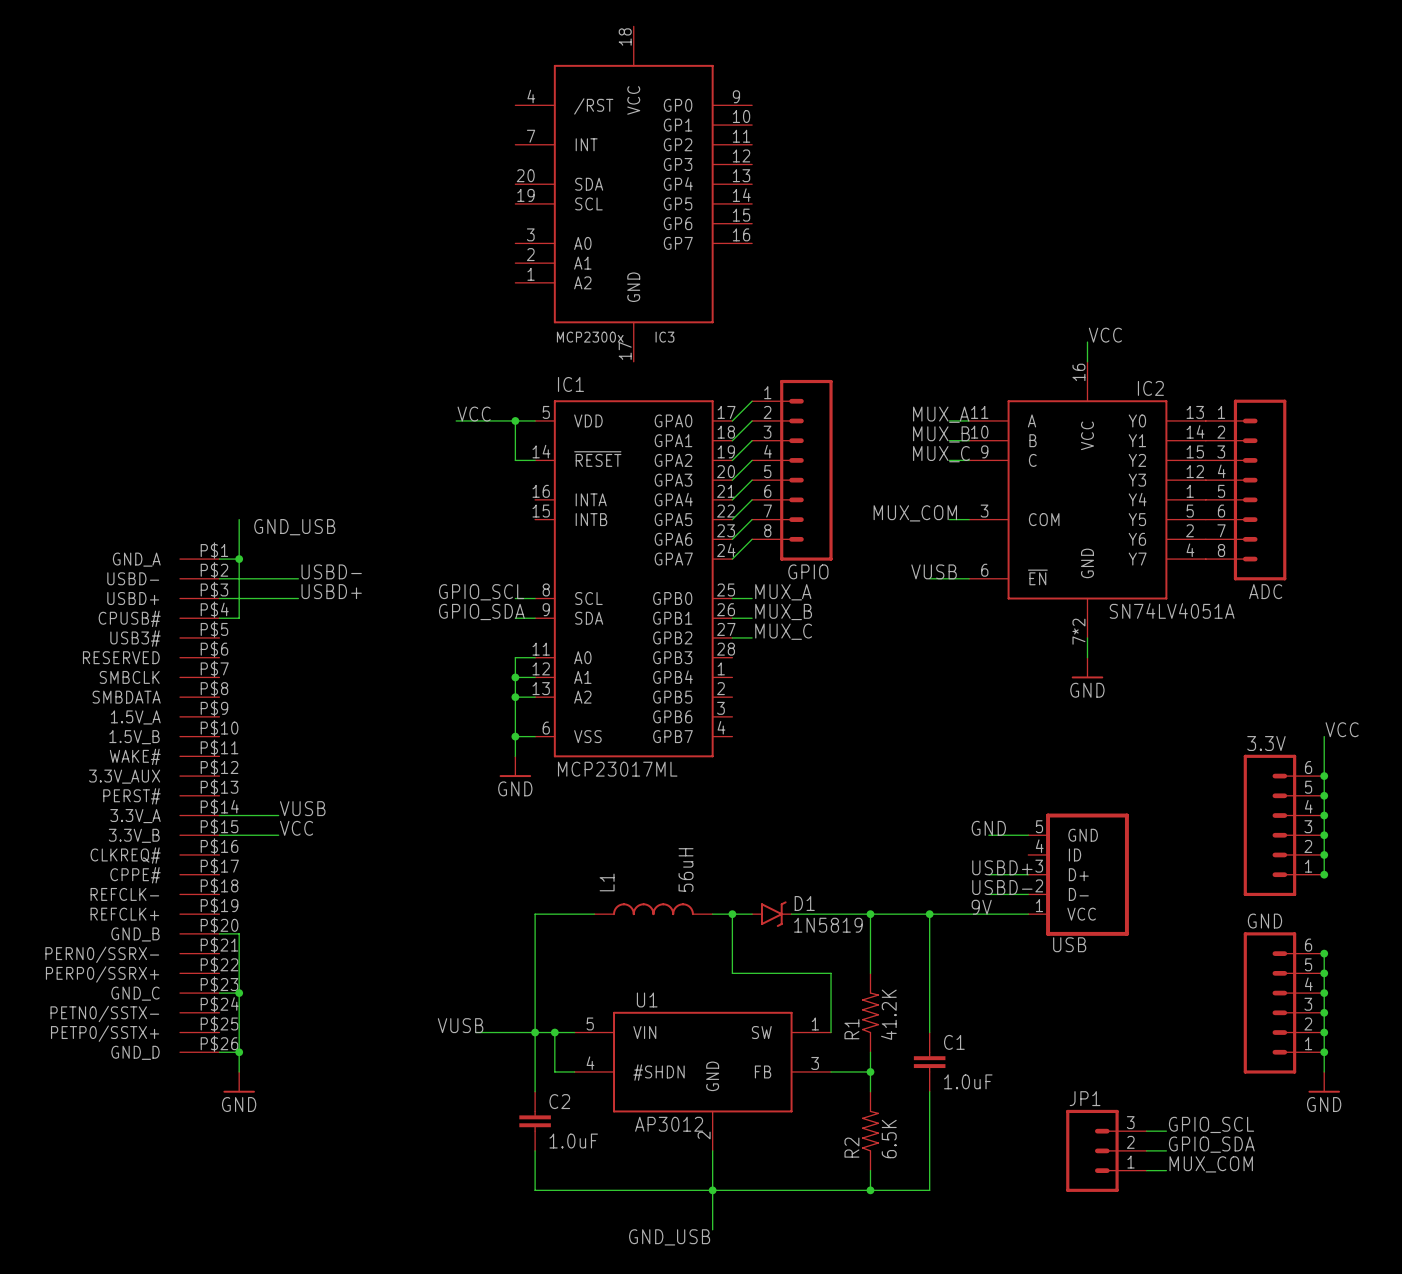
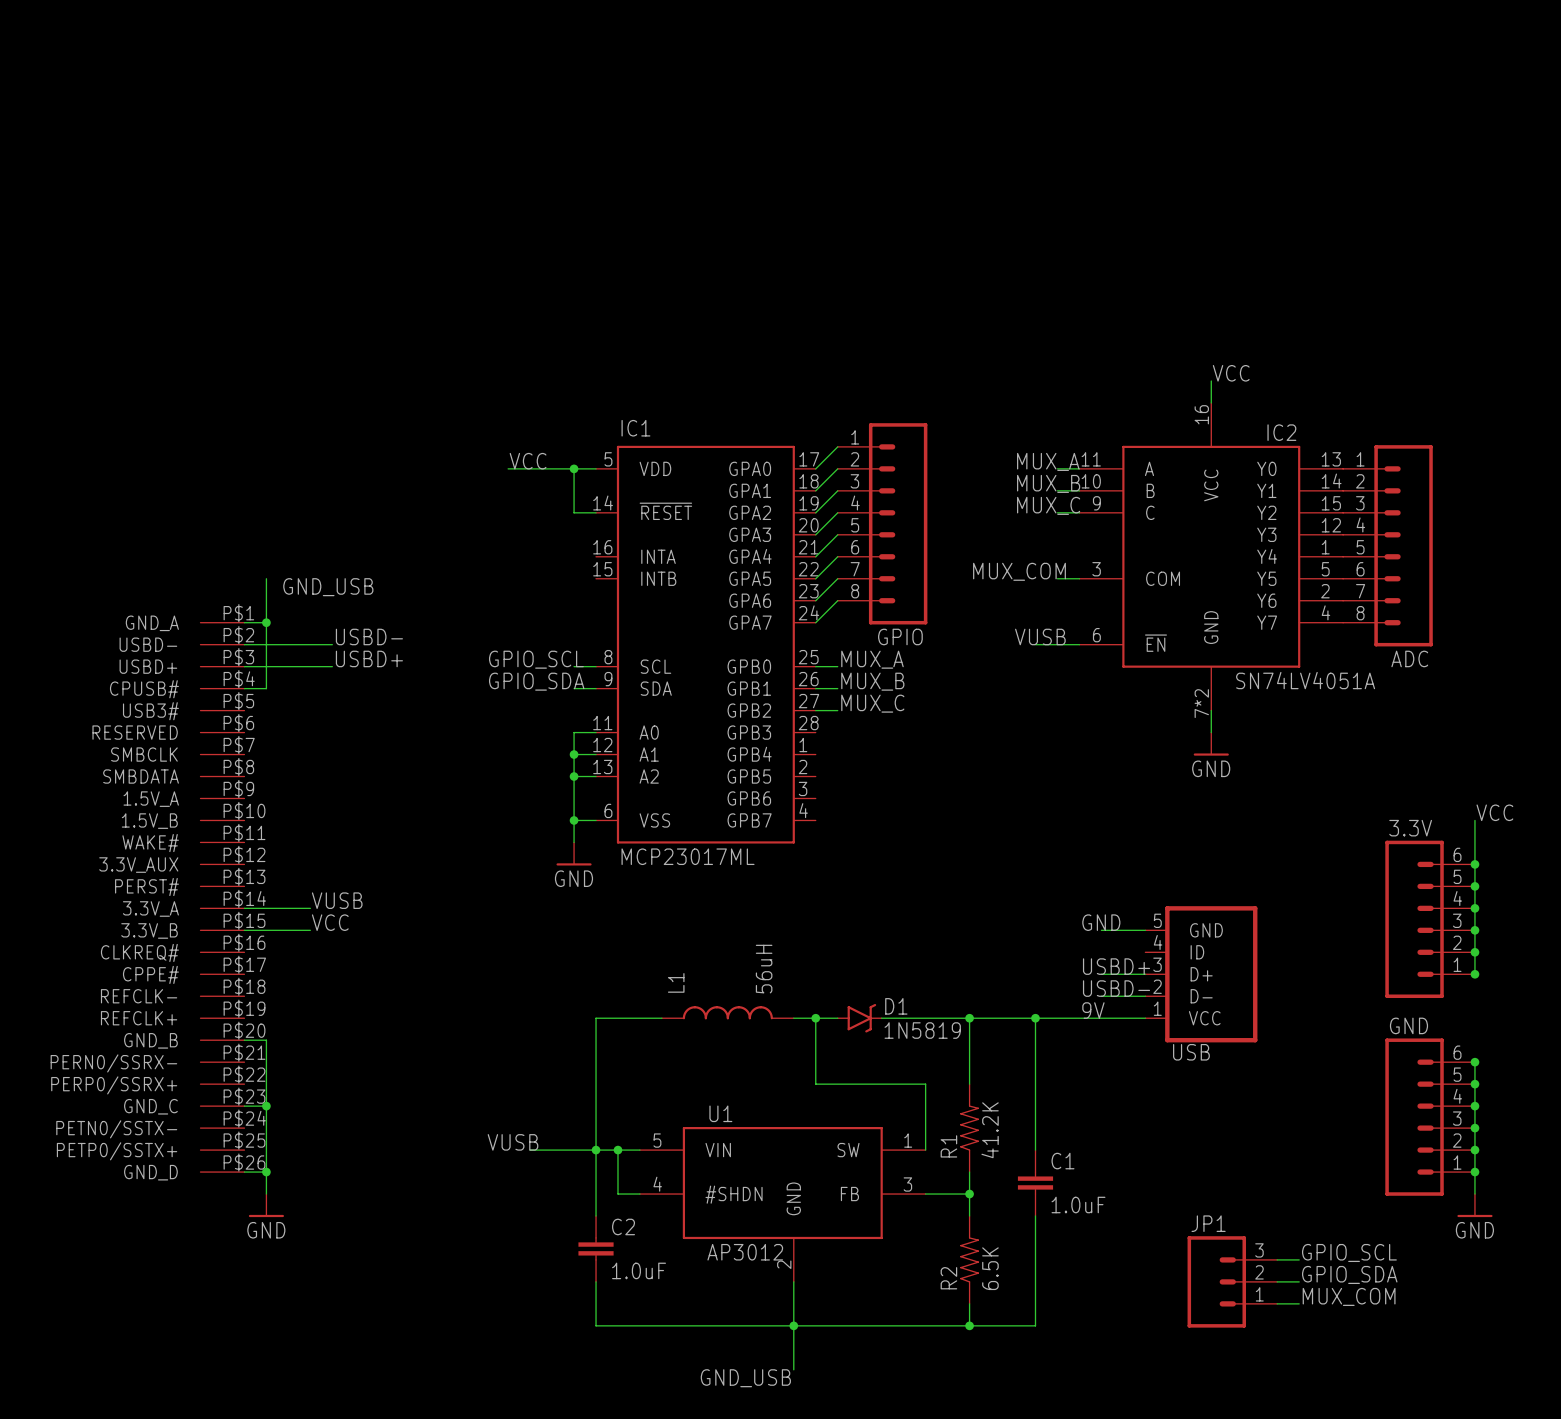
IC3: (633, 194) -> none

